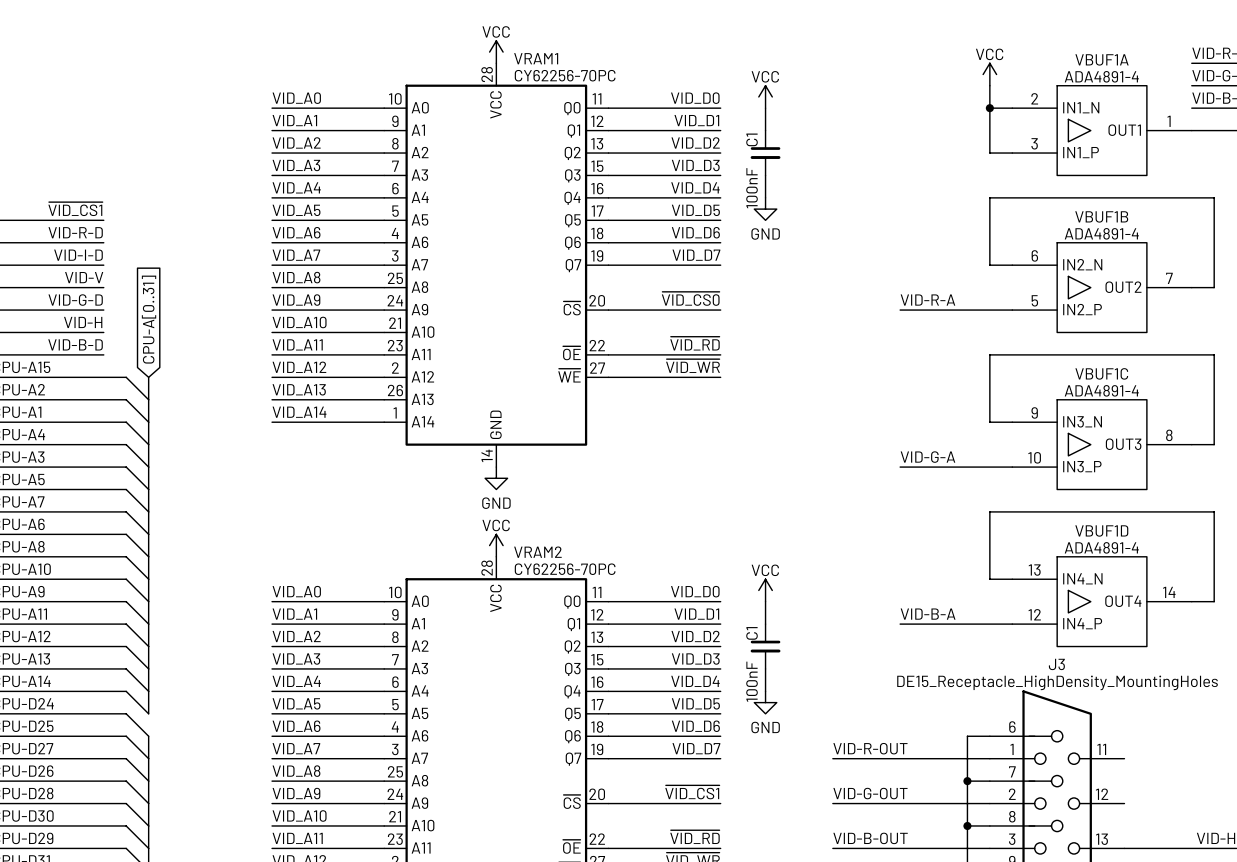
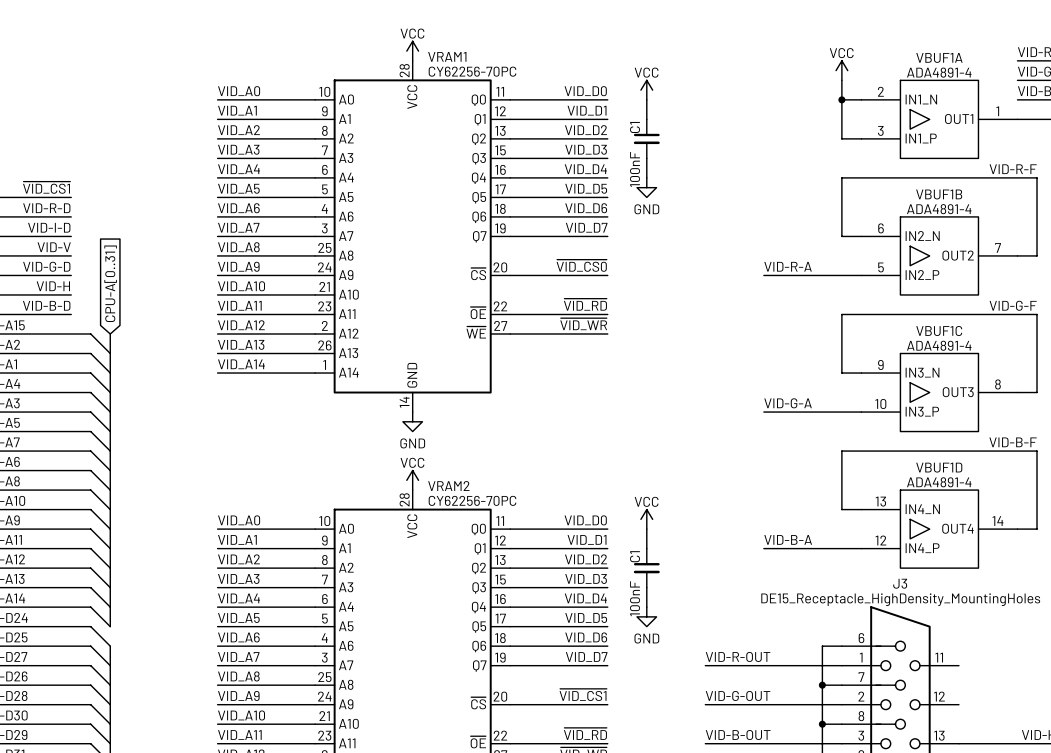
label: none -> VID-R-F (1013, 169)
label: none -> VID-G-F (1013, 305)
label: none -> VID-B-F (1013, 442)

